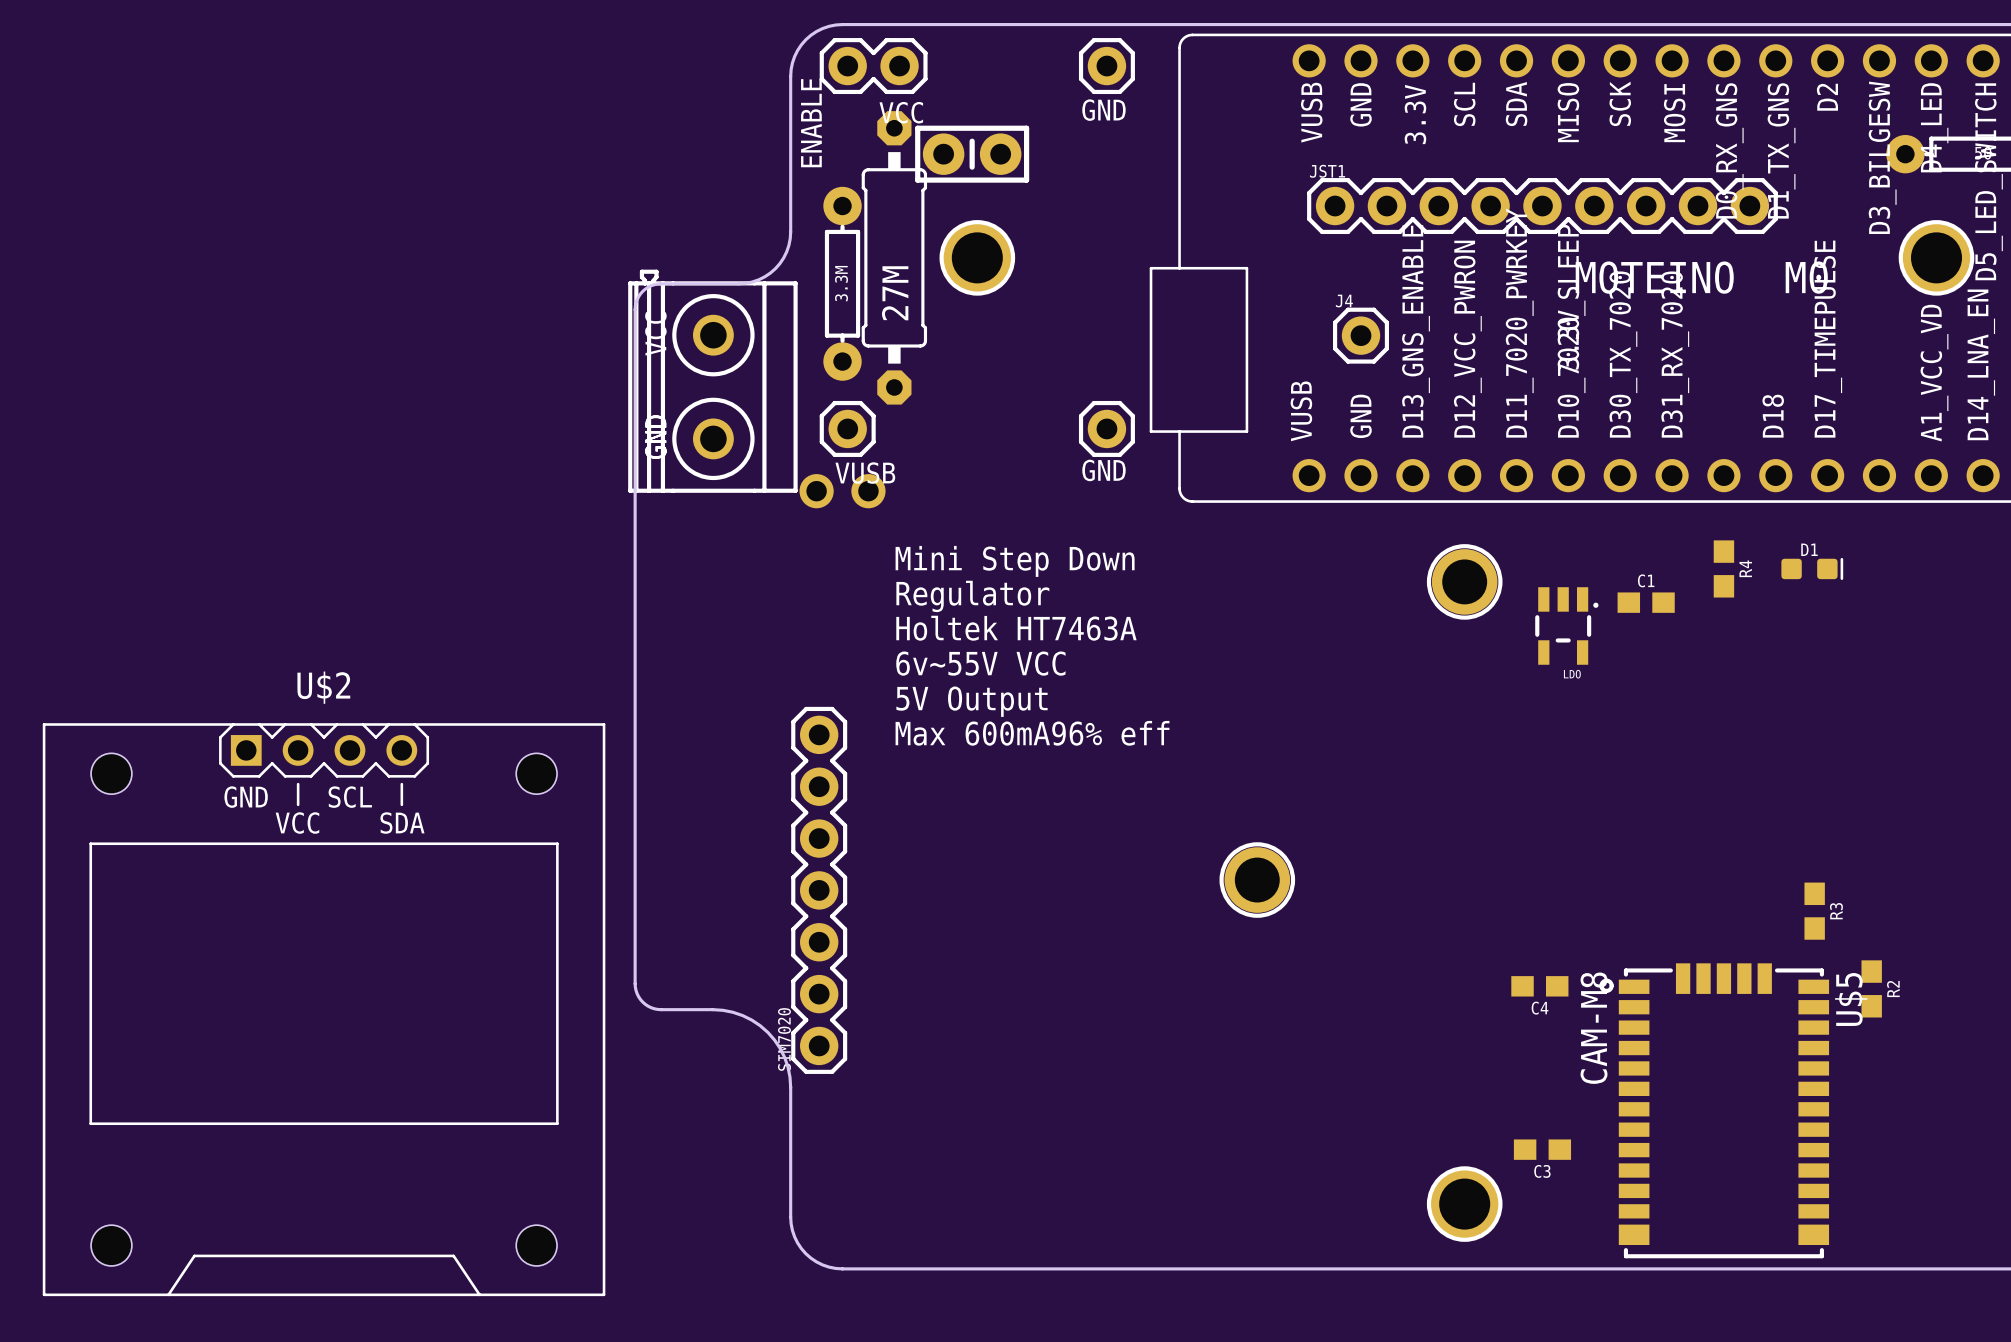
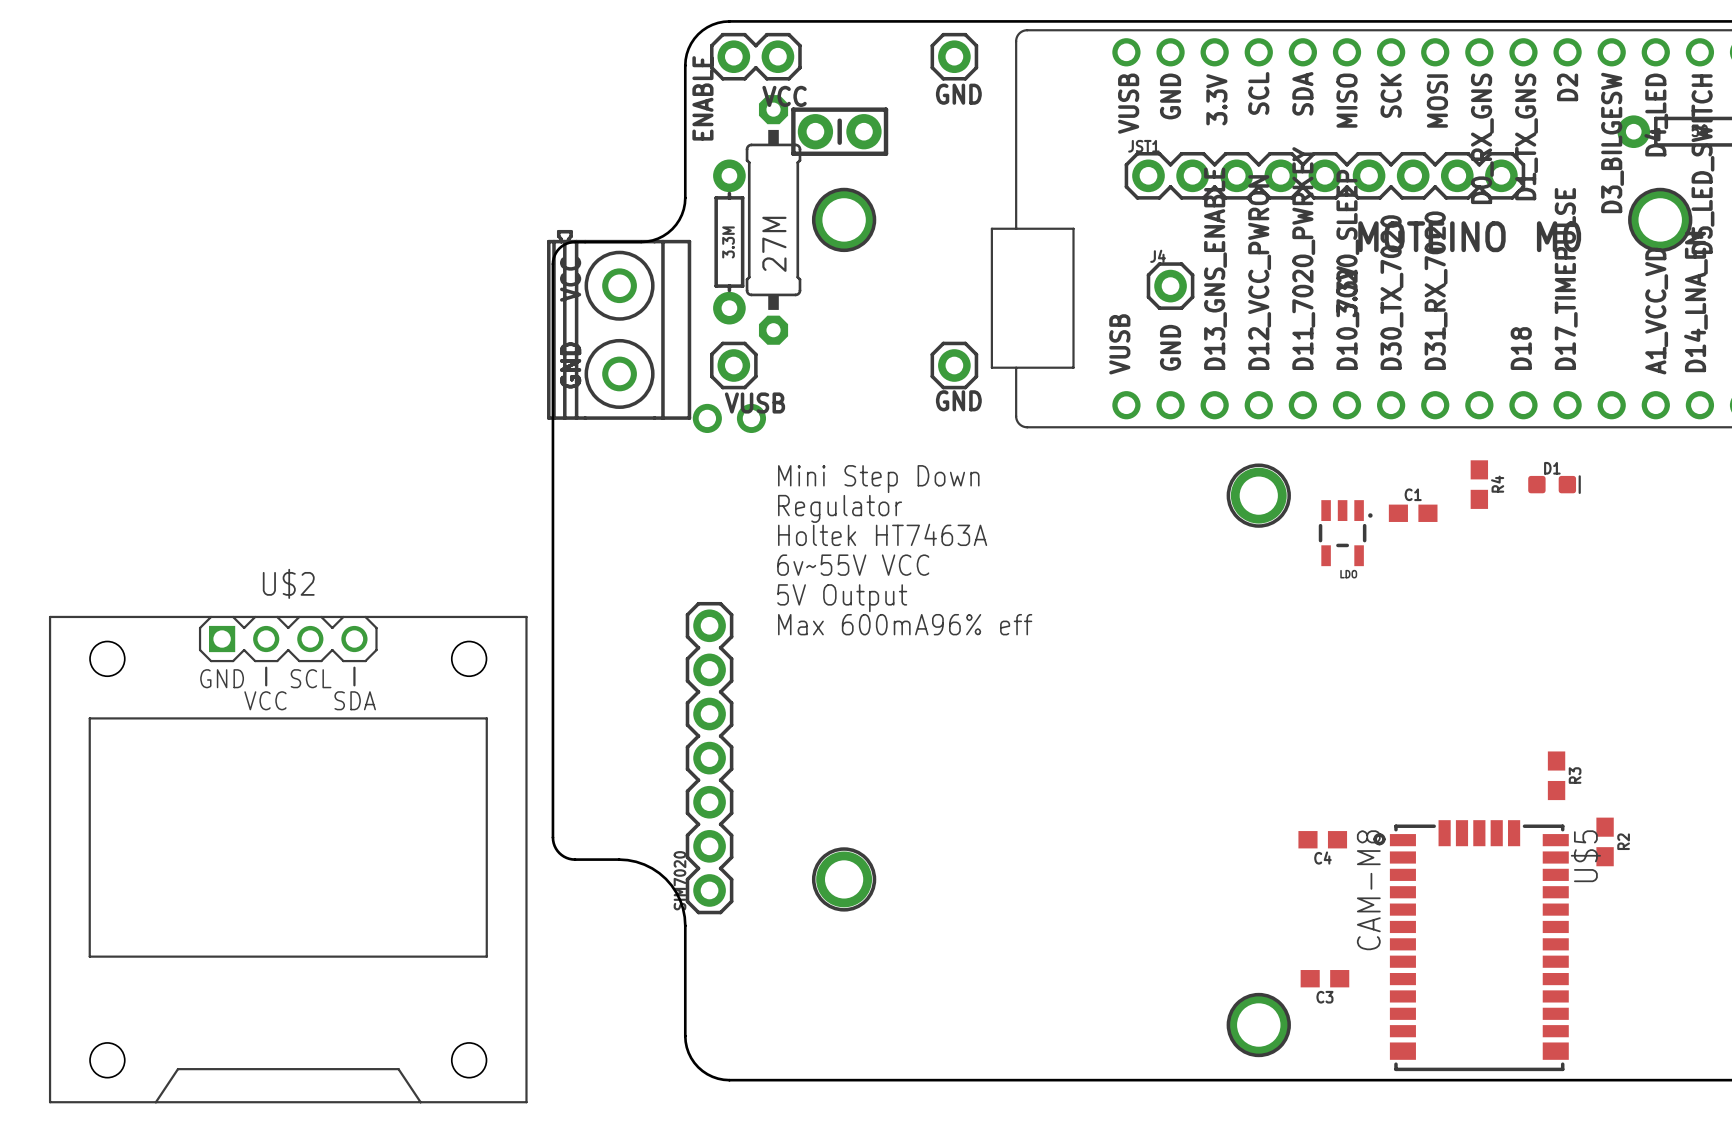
part position: (1257, 880) -> (844, 879)

